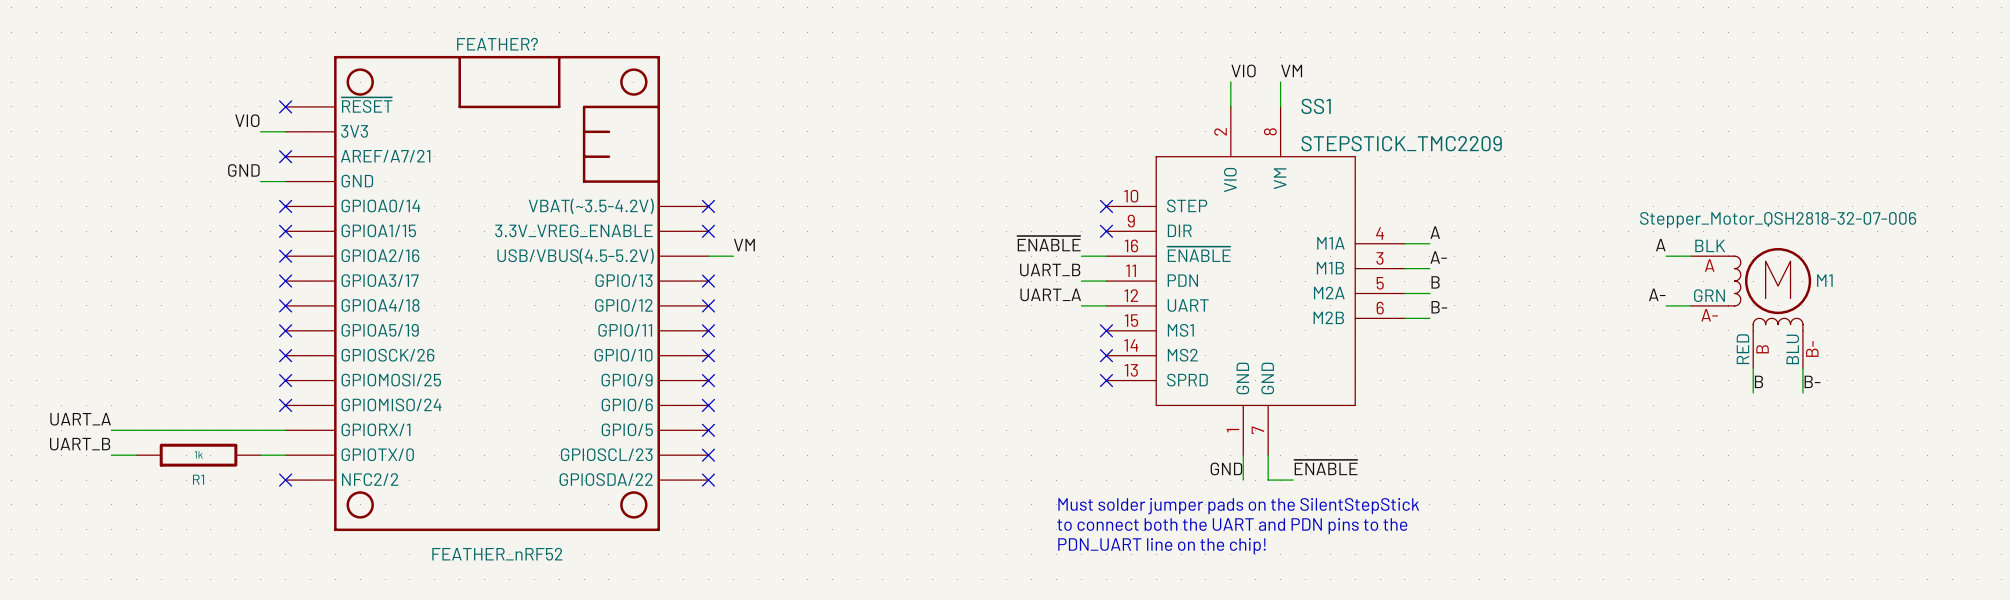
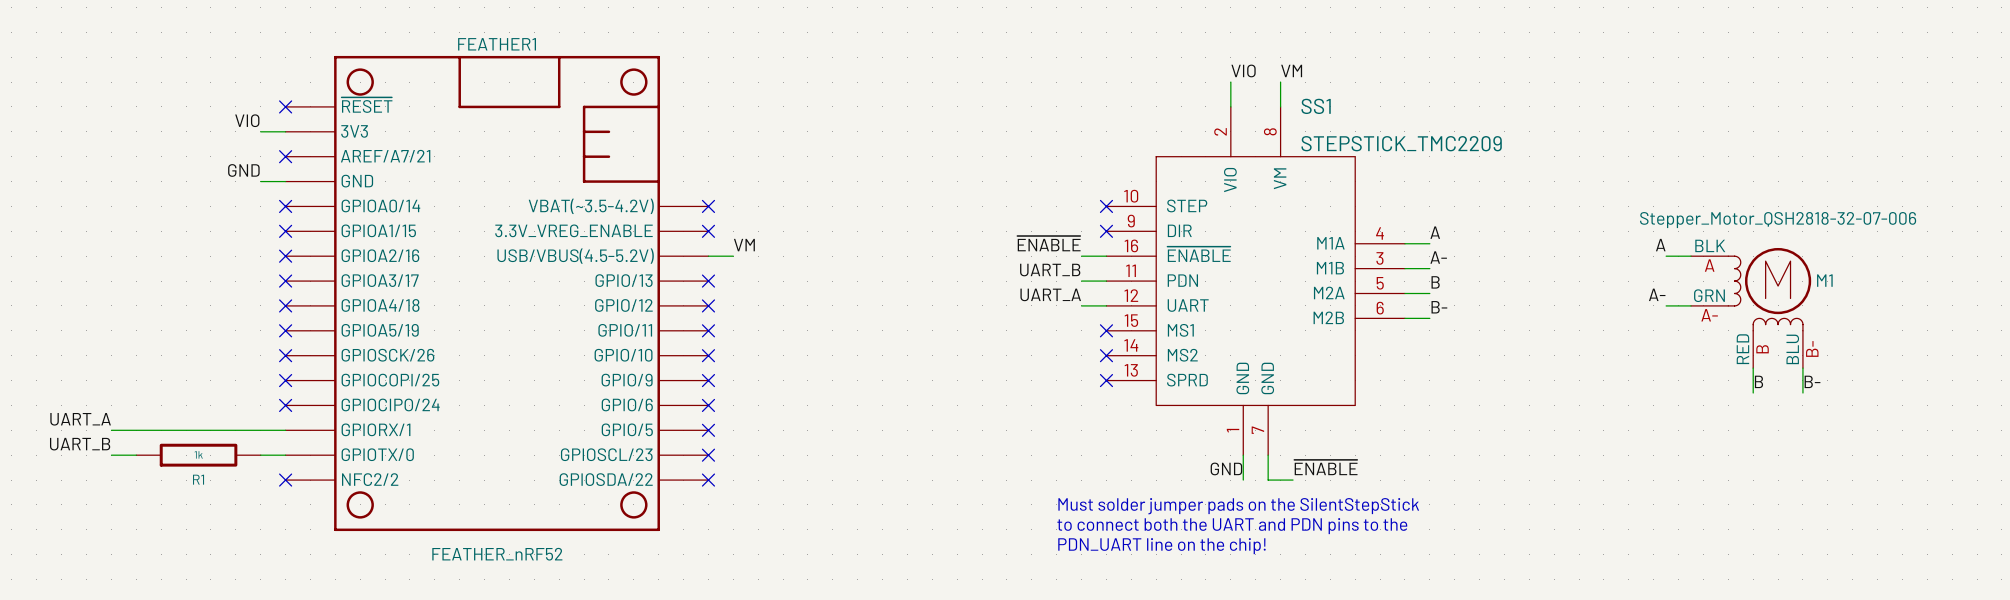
FEATHER? name: FEATHER? (497, 44) -> FEATHER1 (497, 44)
FEATHER? pin name: GPIOMOSI/25 (391, 380) -> GPIOCOPI/25 (390, 380)
FEATHER? pin name: GPIOMISO/24 (391, 404) -> GPIOCIPO/24 (390, 404)

